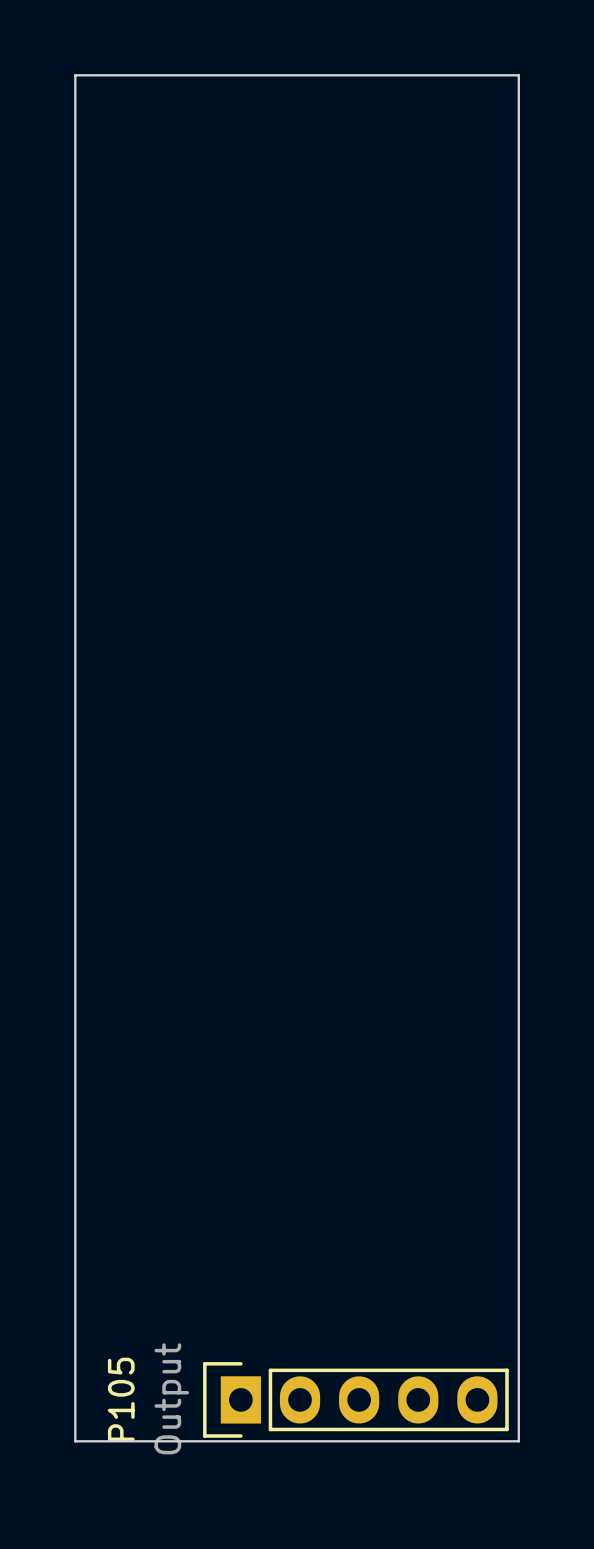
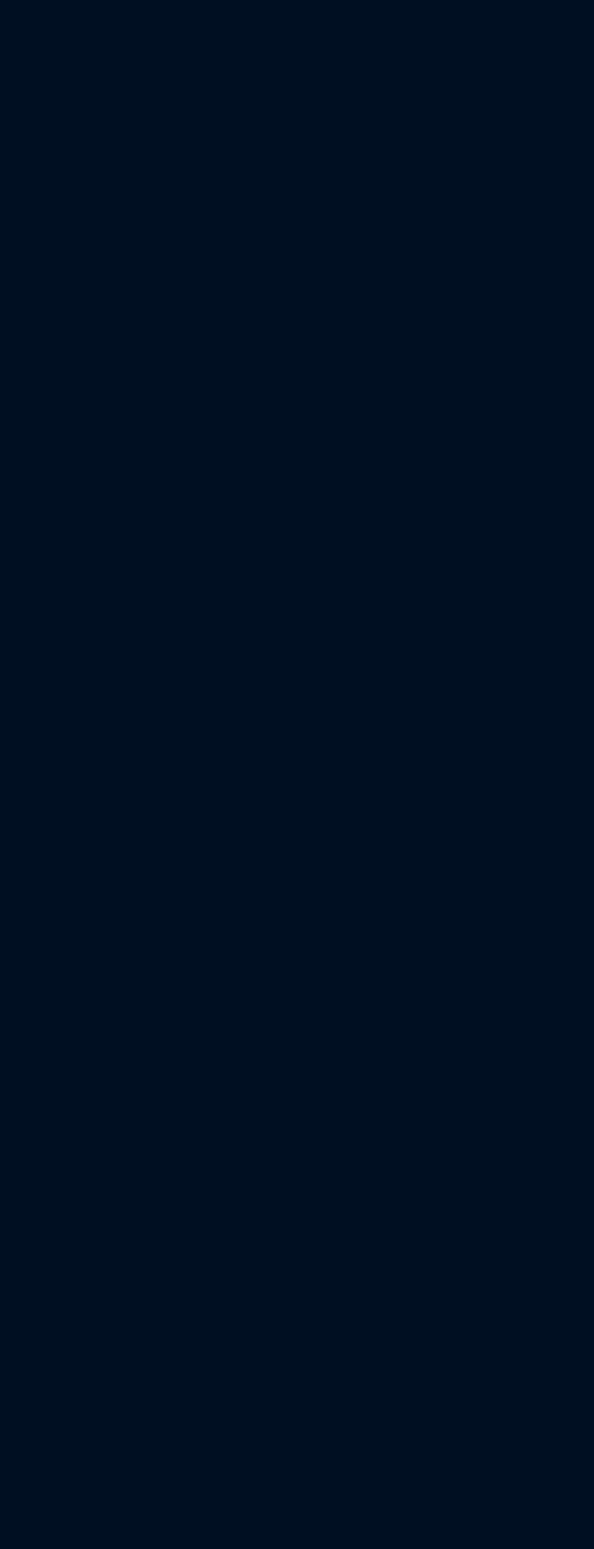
board edge: (75, 75) (518, 75) (518, 1441) (75, 1441) (75, 75) -> none
P105: Output (355, 1399) -> none

